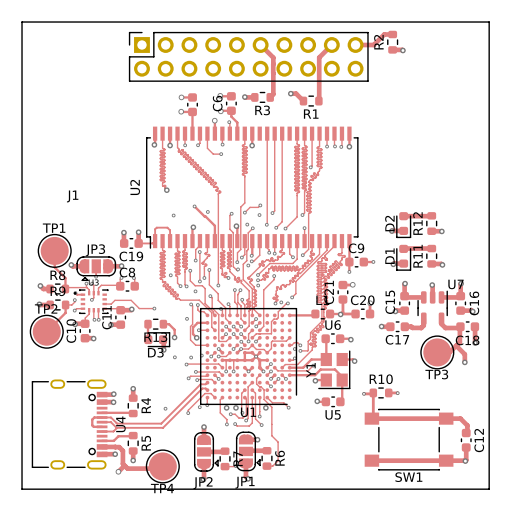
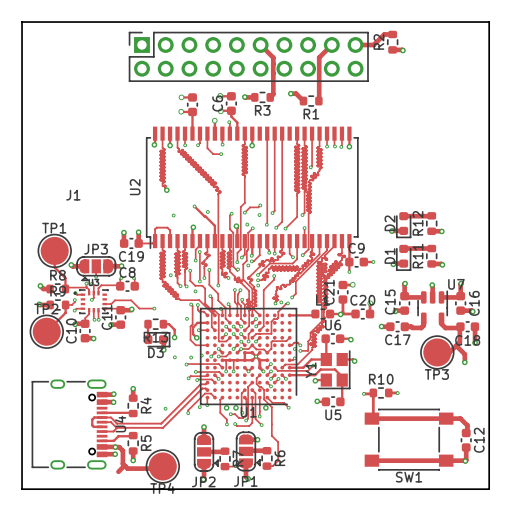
via: none -> (115, 447)
via: (118, 471) -> none

